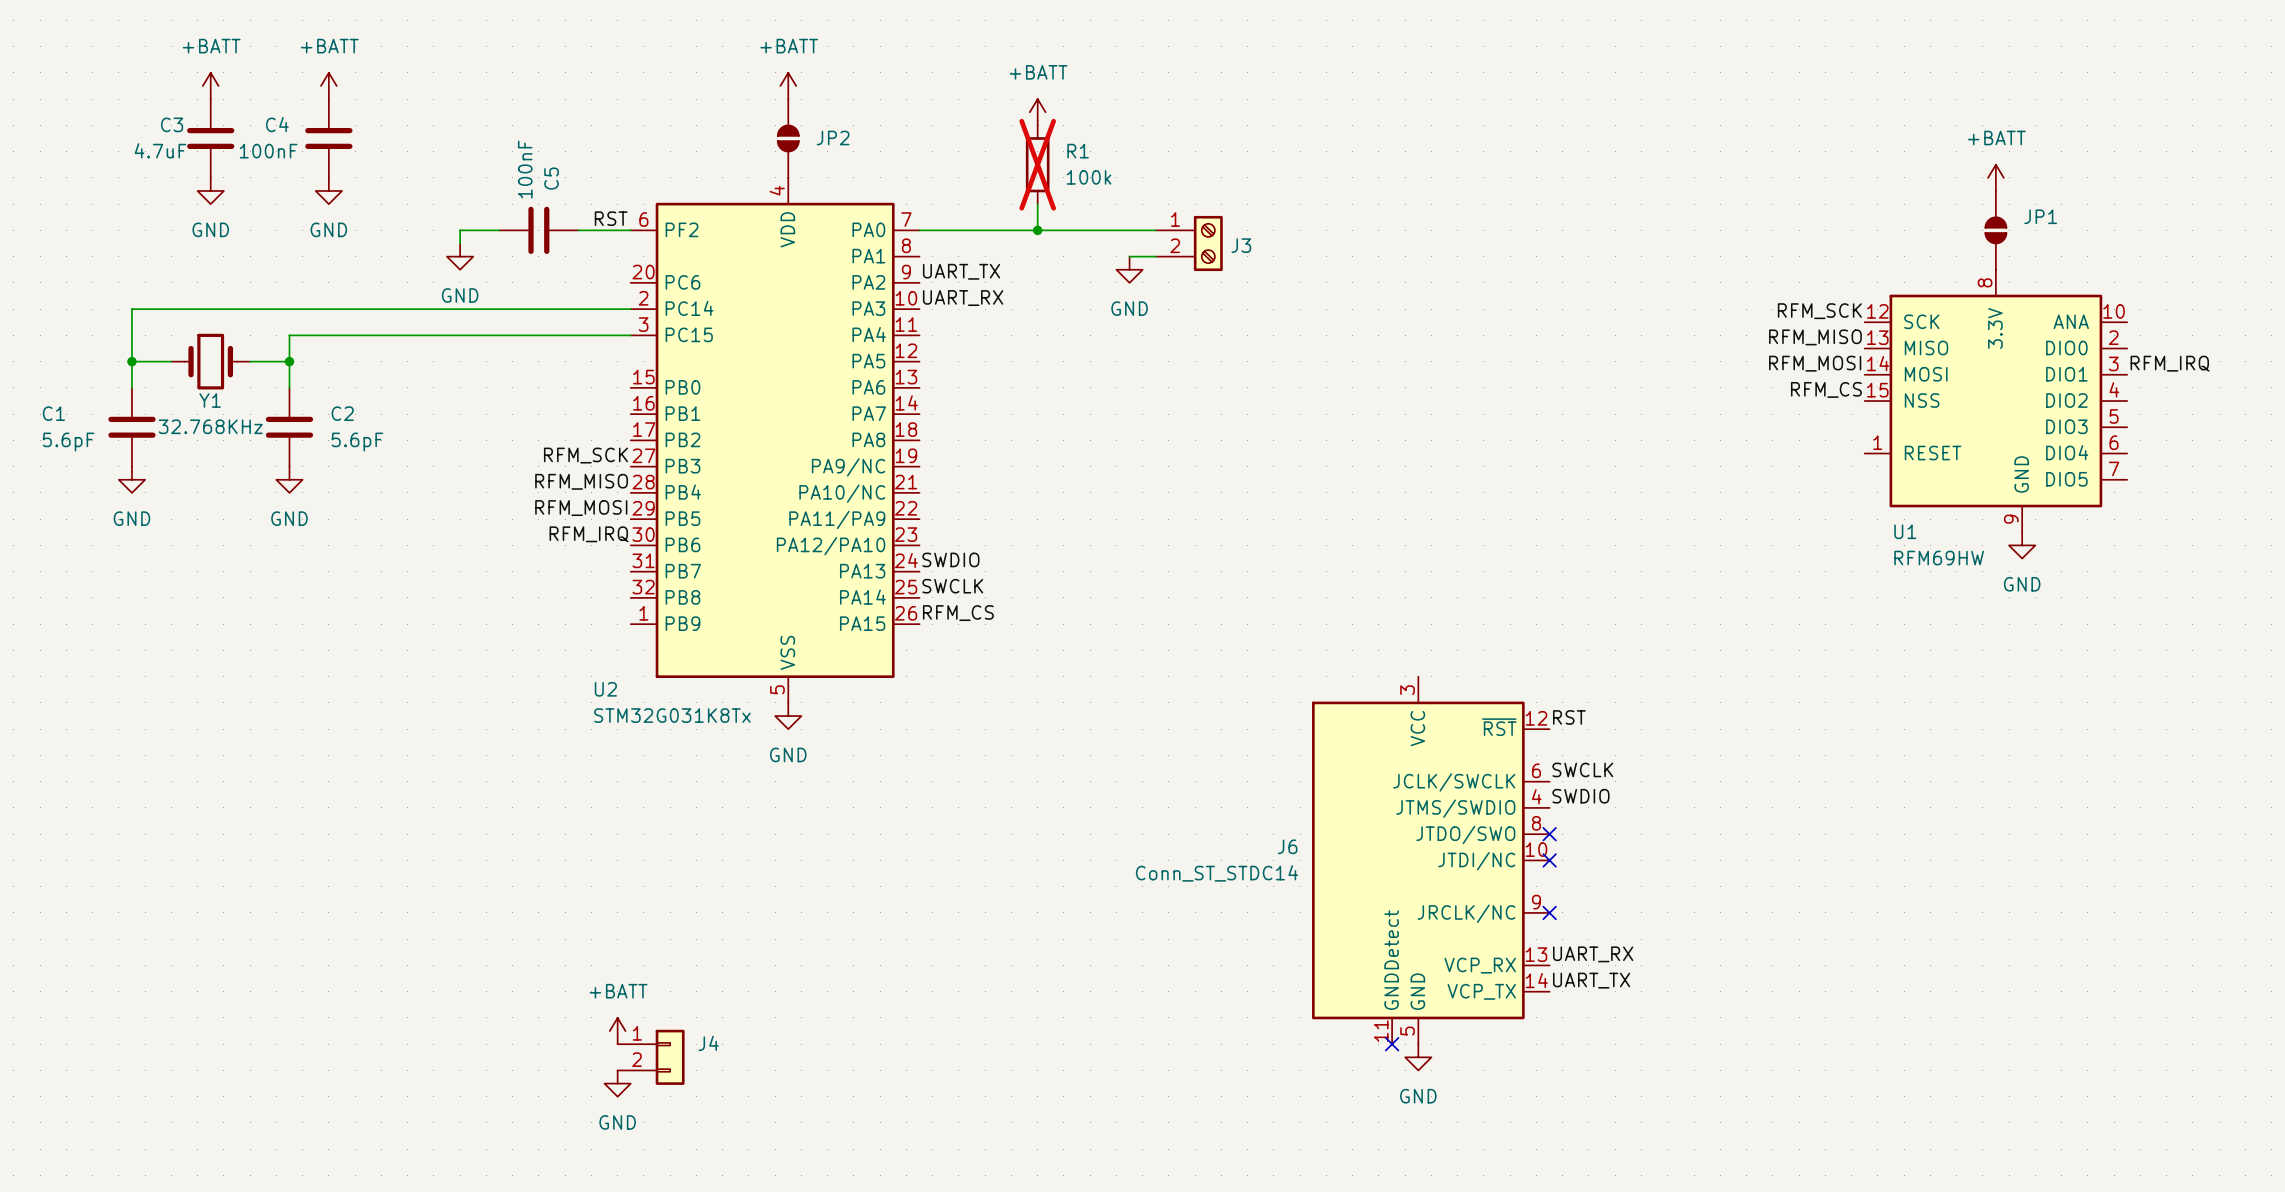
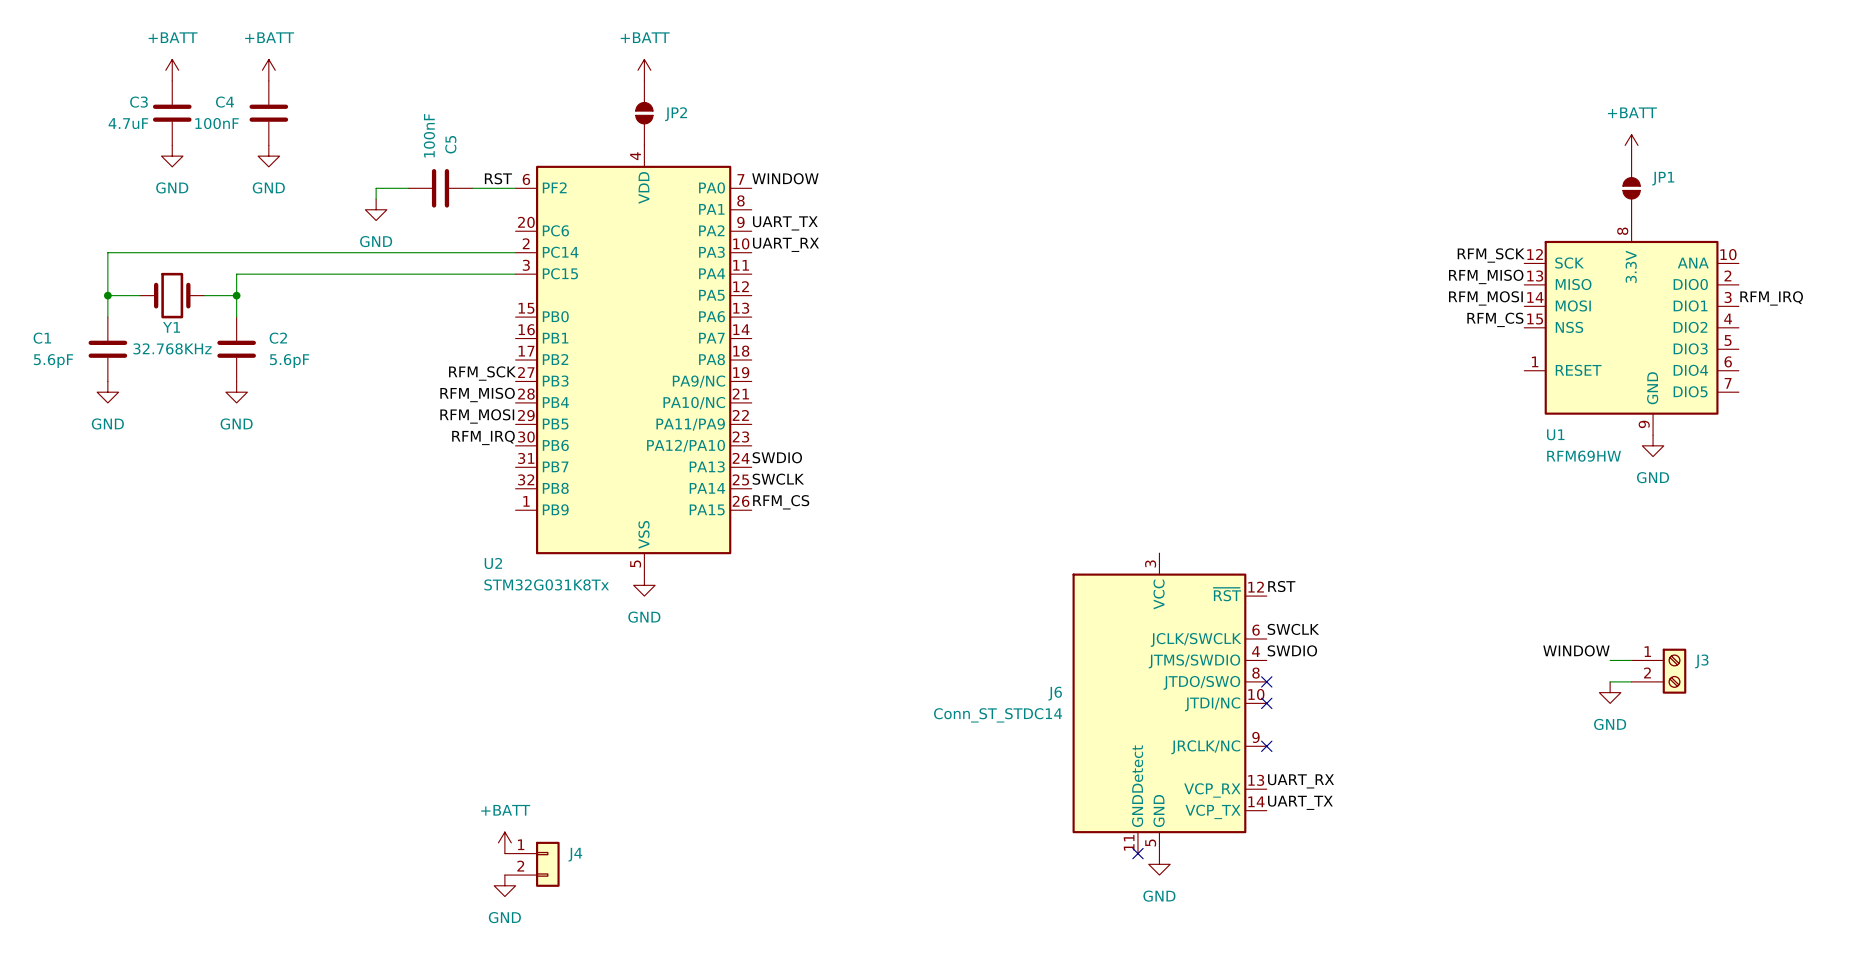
power symbol: +BATT (1037, 112) -> none
R1: 100k (1037, 164) -> none
wire: (1037, 204) (1037, 230) -> none
label: none -> WINDOW (785, 178)
wire: (919, 230) (1155, 230) -> none
junction: (1037, 230) -> none
J3 position: (1189, 243) -> (1658, 671)
J3 name position: J3 (1241, 245) -> J3 (1701, 661)
wire: (1129, 256) (1155, 256) -> none
power symbol: GND (1129, 269) -> none
label: none -> WINDOW (1576, 650)
wire: none -> (1610, 660) (1631, 660)
wire: none -> (1610, 681) (1631, 681)
power symbol: none -> GND (1610, 692)

